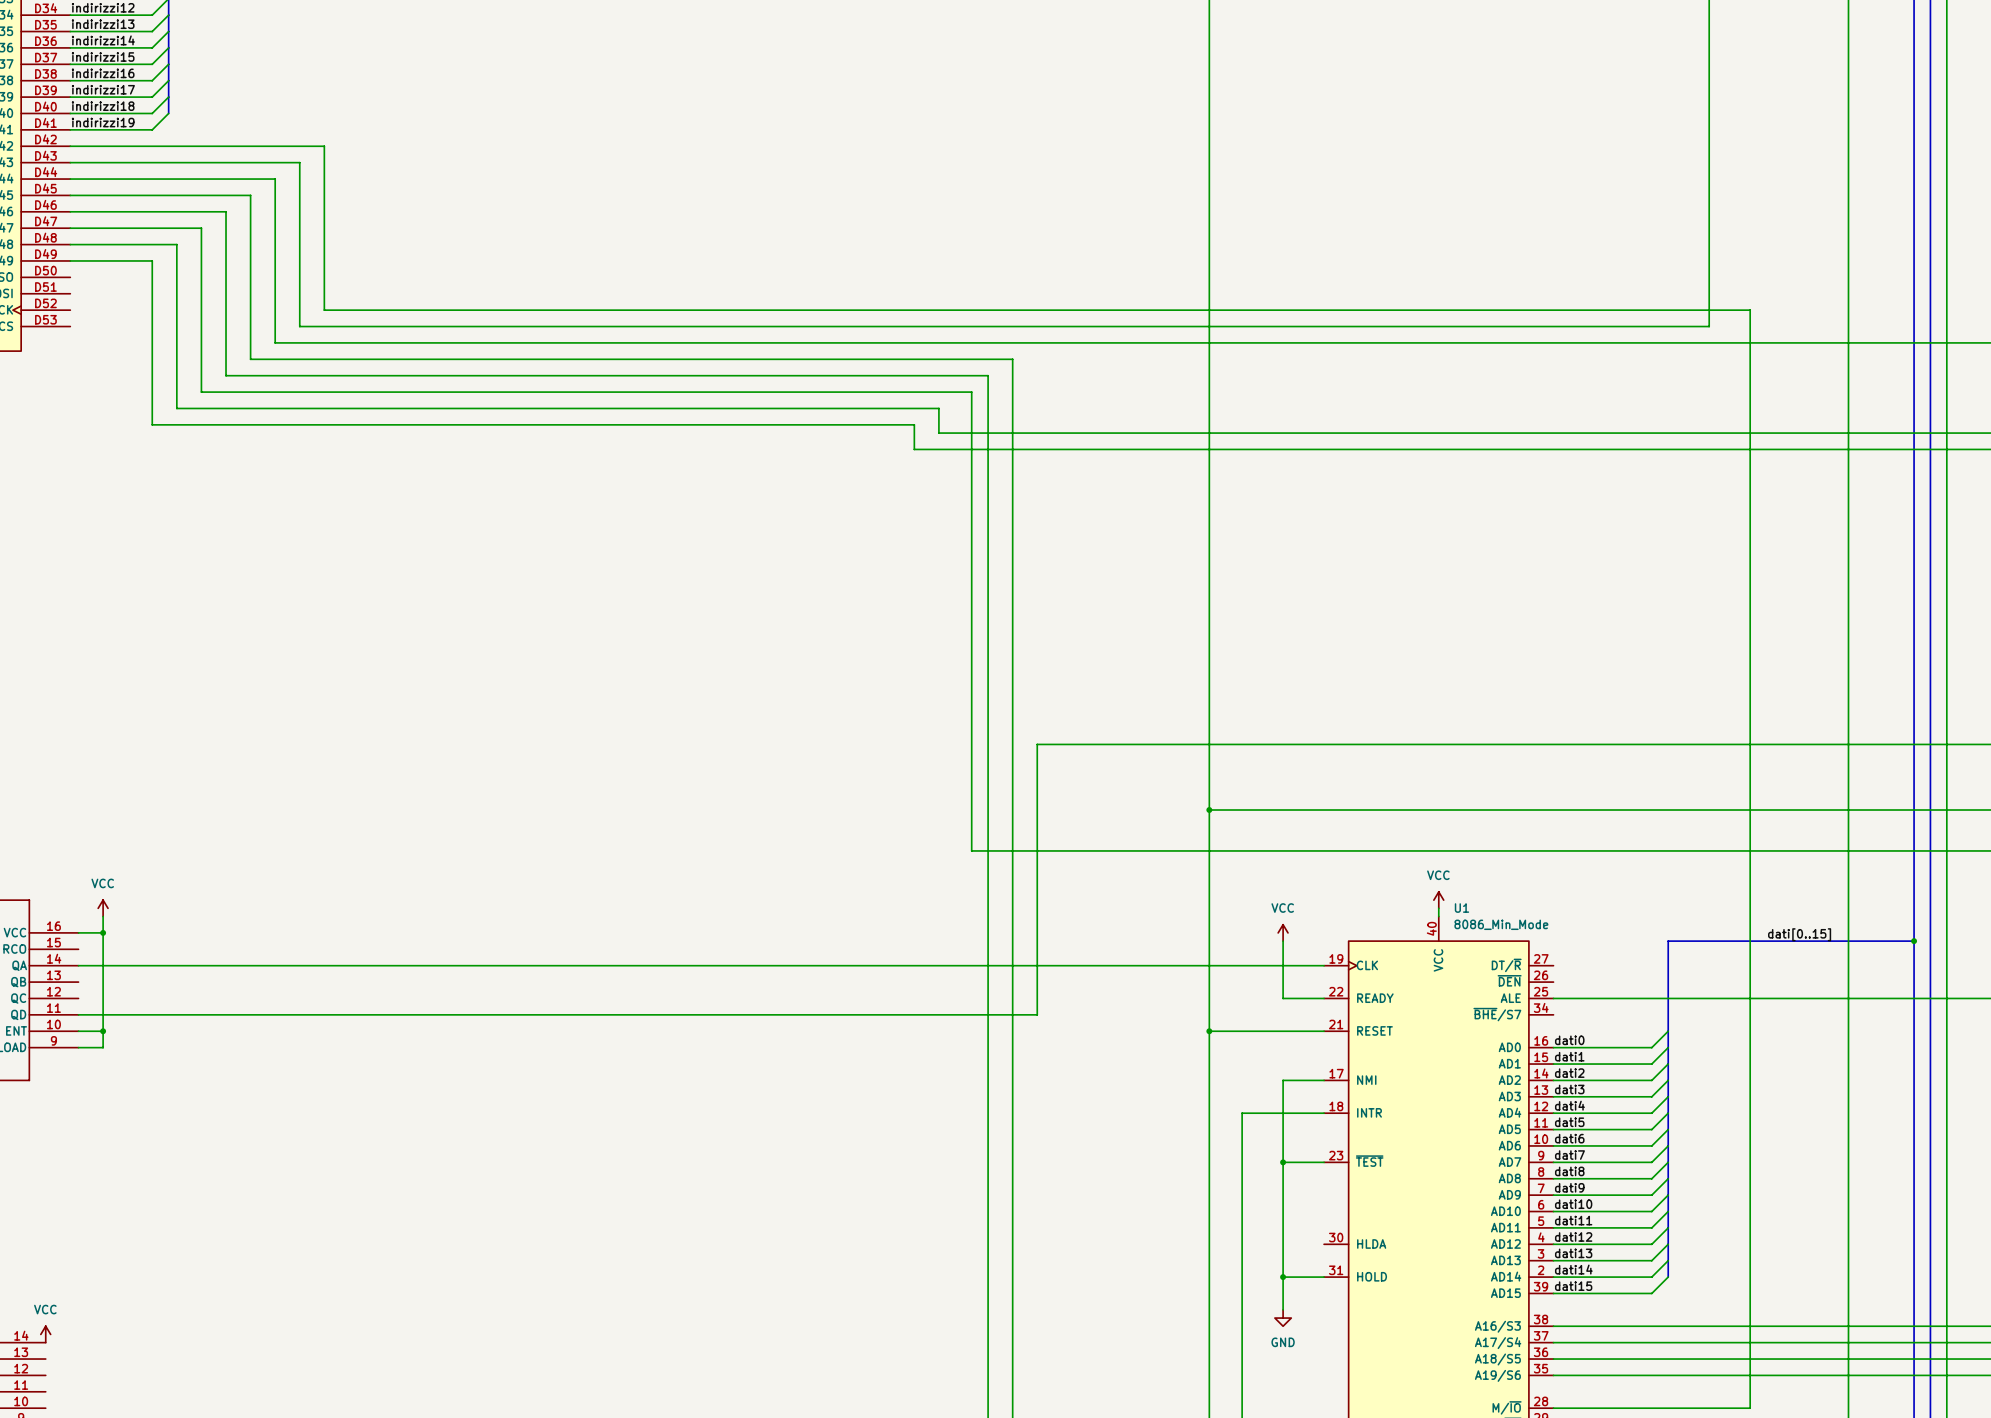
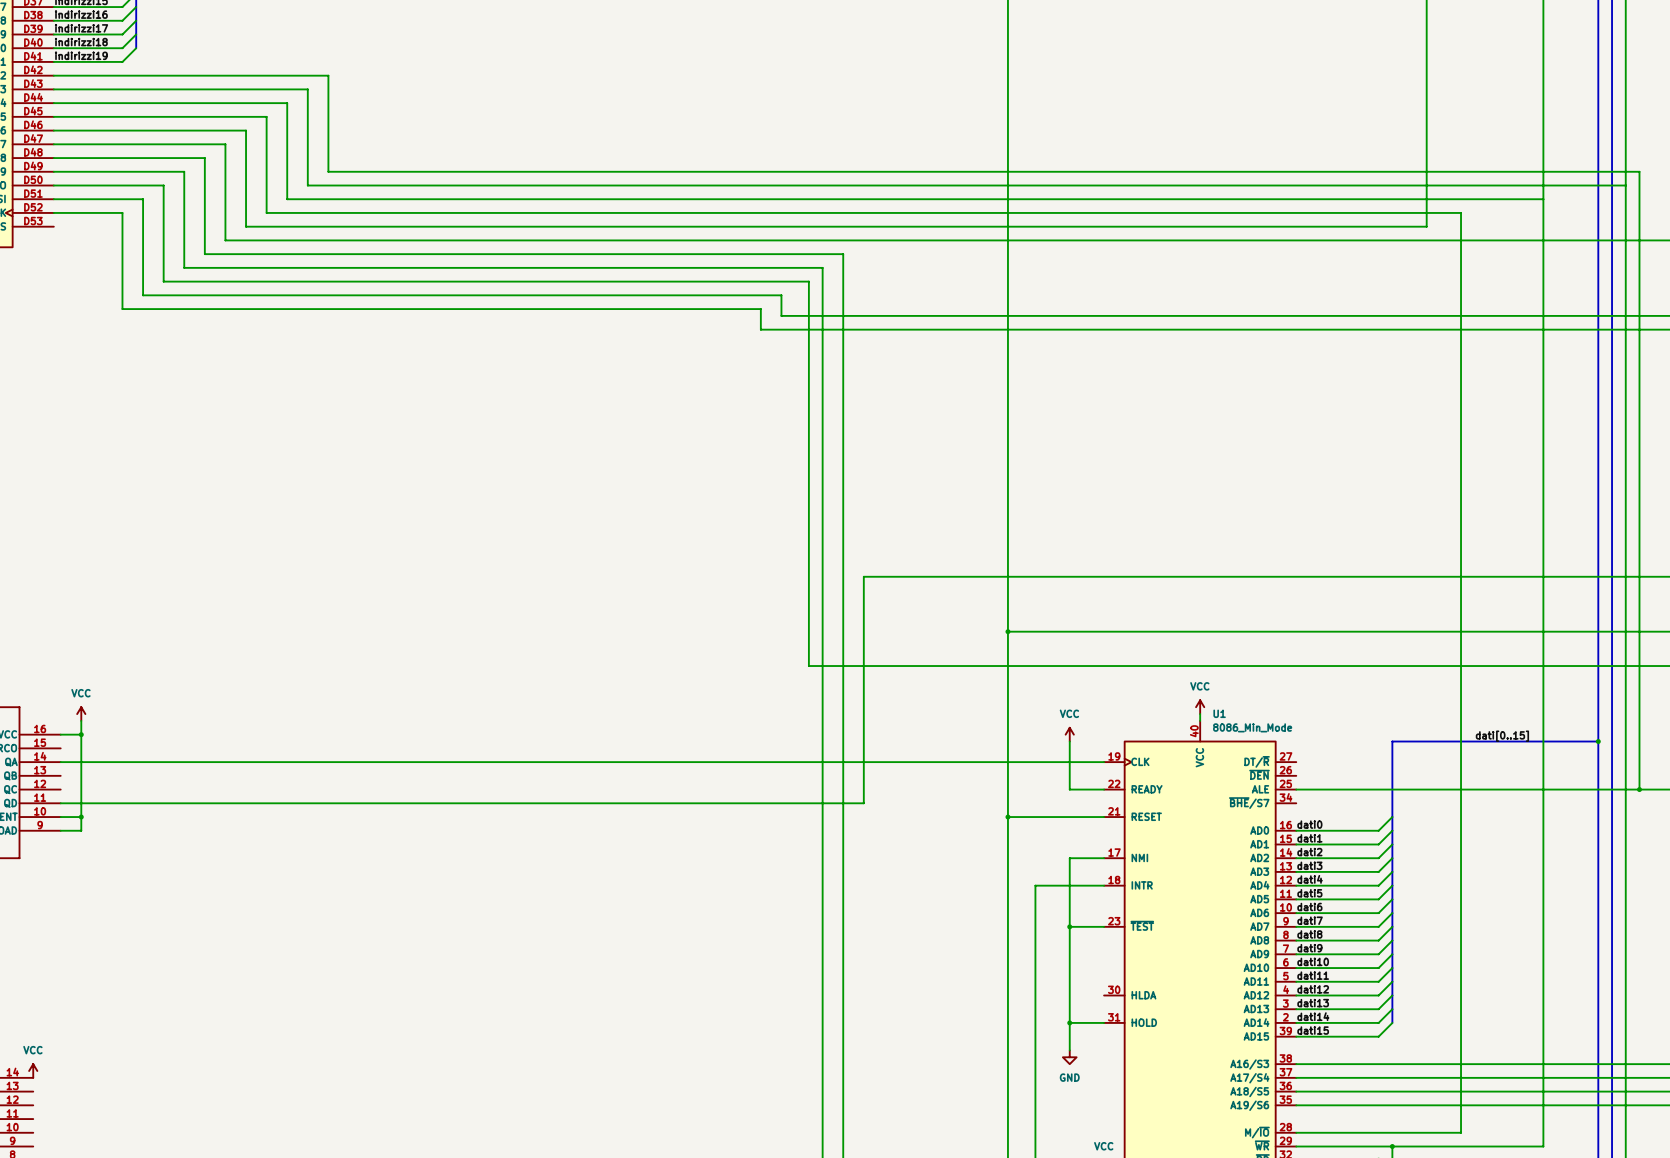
wire: (324, 146) (324, 195) -> (204, 116) (266, 116)
wire: none -> (266, 75) (328, 75) (328, 171) (1639, 171) (1639, 789)
wire: (299, 162) (299, 211) -> (184, 130) (246, 130)
wire: none -> (246, 89) (307, 89) (307, 185) (1625, 185)
wire: (275, 179) (275, 228) -> (163, 144) (225, 144)
wire: none -> (225, 103) (287, 103) (287, 199) (1543, 199)
wire: (250, 195) (250, 244) -> (143, 158) (204, 158)
wire: (226, 211) (226, 260) -> (122, 171) (184, 171)
wire: (201, 228) (201, 277) -> (53, 185) (163, 185)
wire: (176, 244) (176, 293) -> (53, 199) (143, 199)
wire: (152, 260) (152, 310) -> (53, 212) (122, 212)
junction: none -> (1639, 789)

